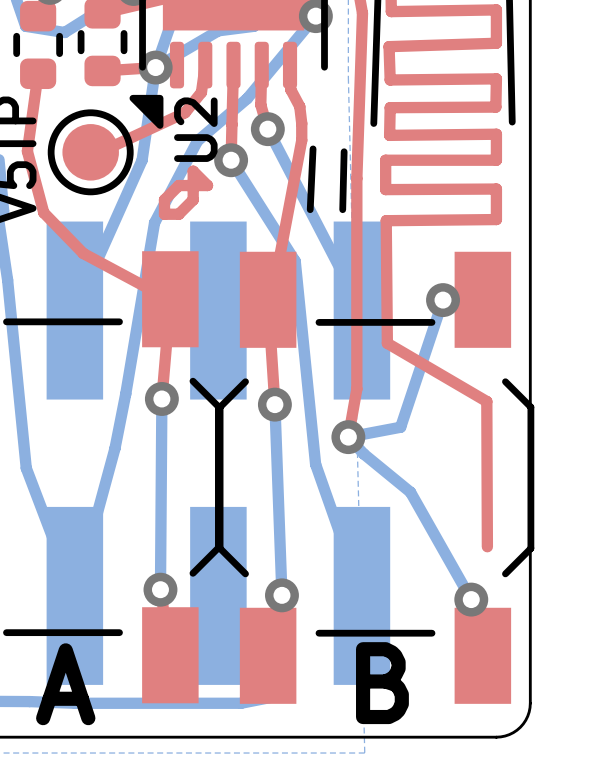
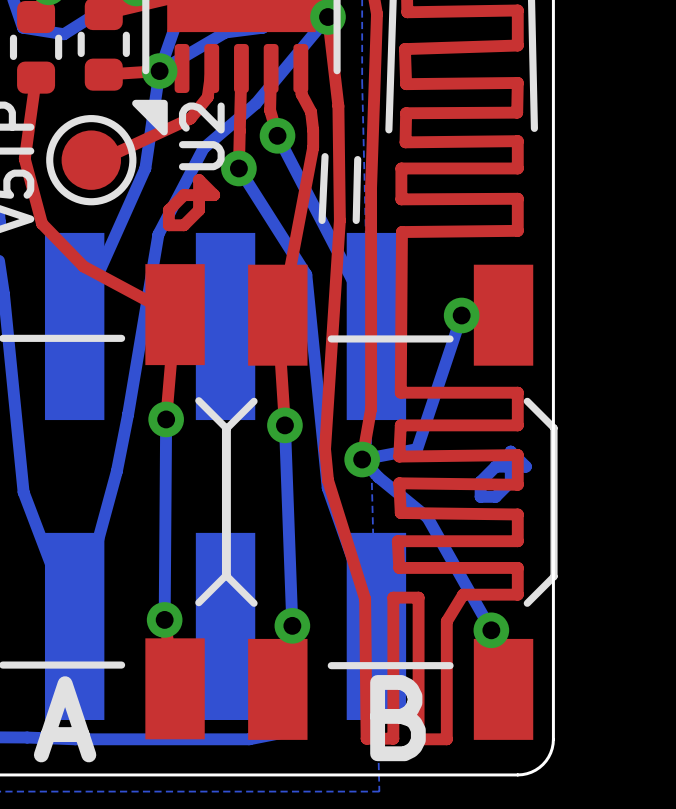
top track: (386, 220) (387, 343) (486, 401) (487, 546) -> (401, 232) (400, 392) (517, 392) (517, 425) (400, 425) (399, 456) (517, 455) (517, 484) (399, 483) (400, 513) (517, 514) (517, 541) (397, 541) (399, 567) (517, 567) (517, 594) (463, 594) (446, 621) (446, 739) (418, 739) (418, 597) (393, 597) (393, 738) (366, 738) (365, 599) (328, 480) (325, 449) (339, 220) (338, 106) (328, 17)
bottom track: none -> (510, 451) (525, 466) (495, 466) (480, 481) (480, 496) (495, 496) (510, 481) (510, 451)

